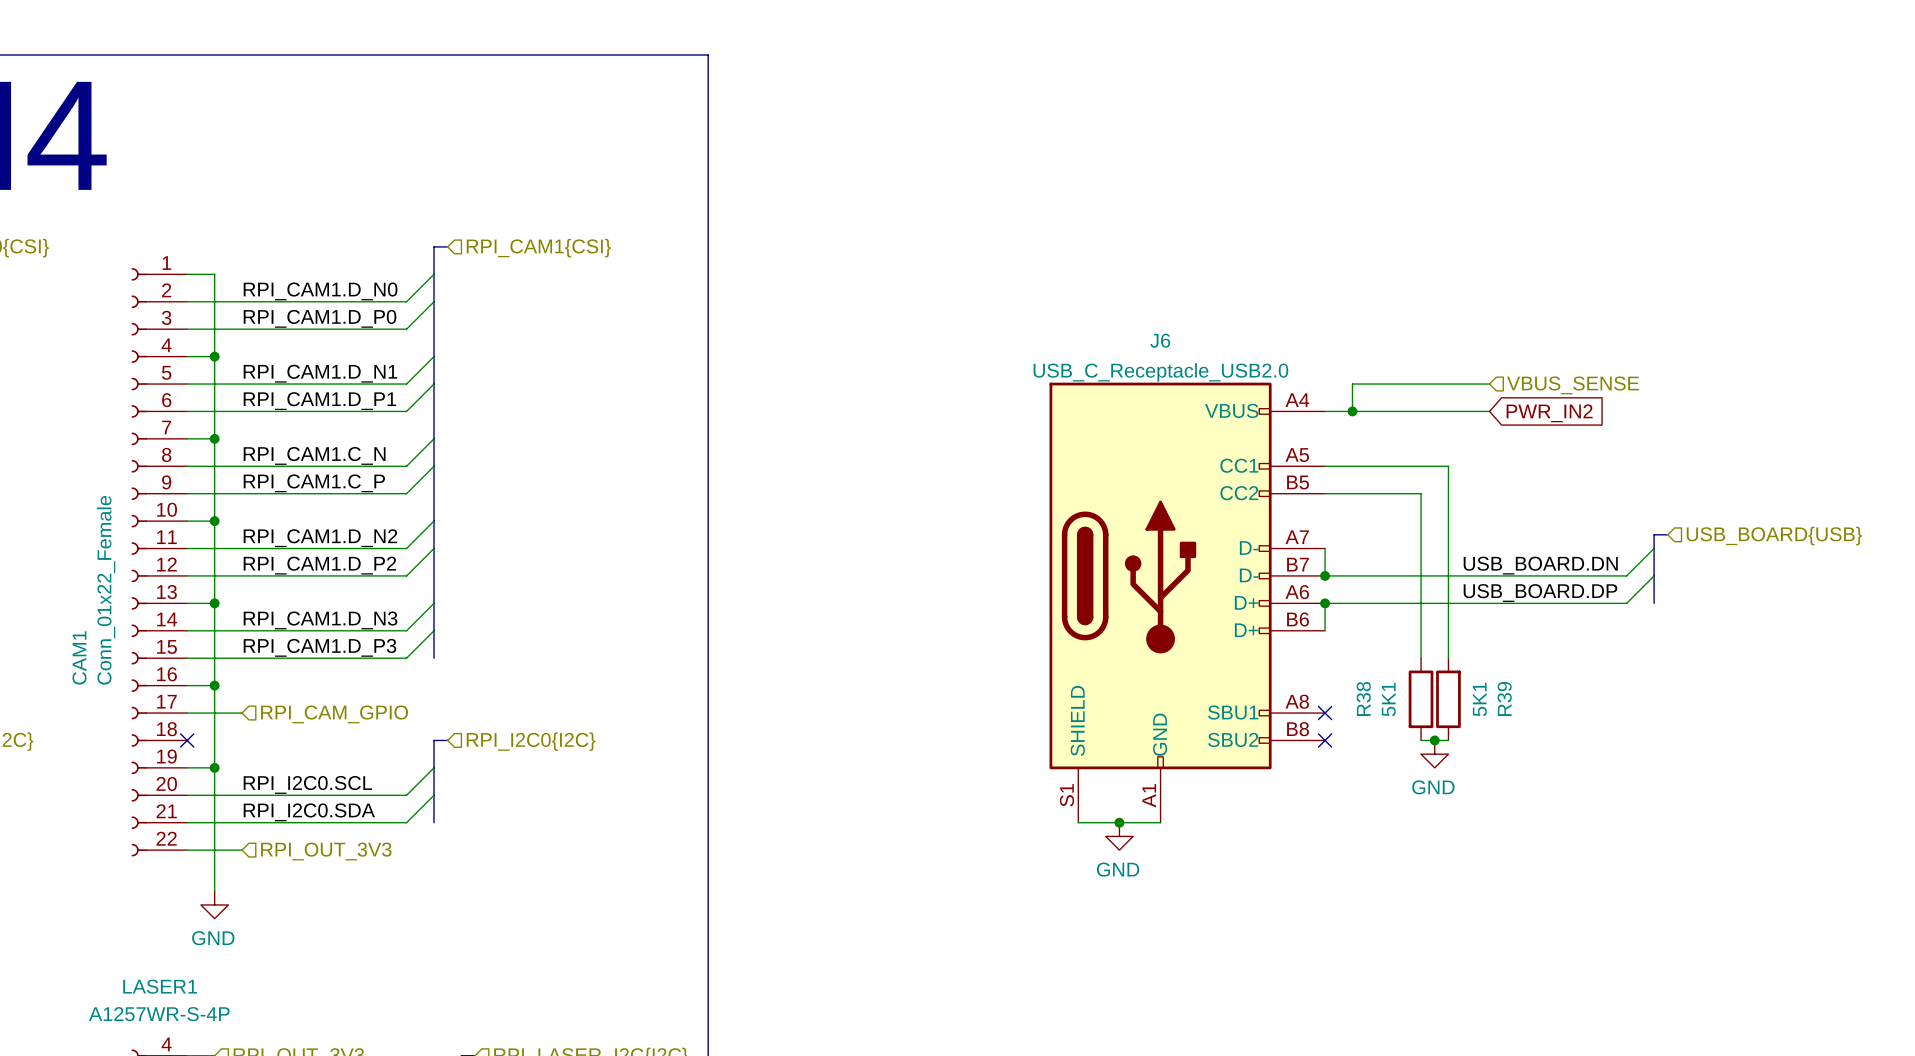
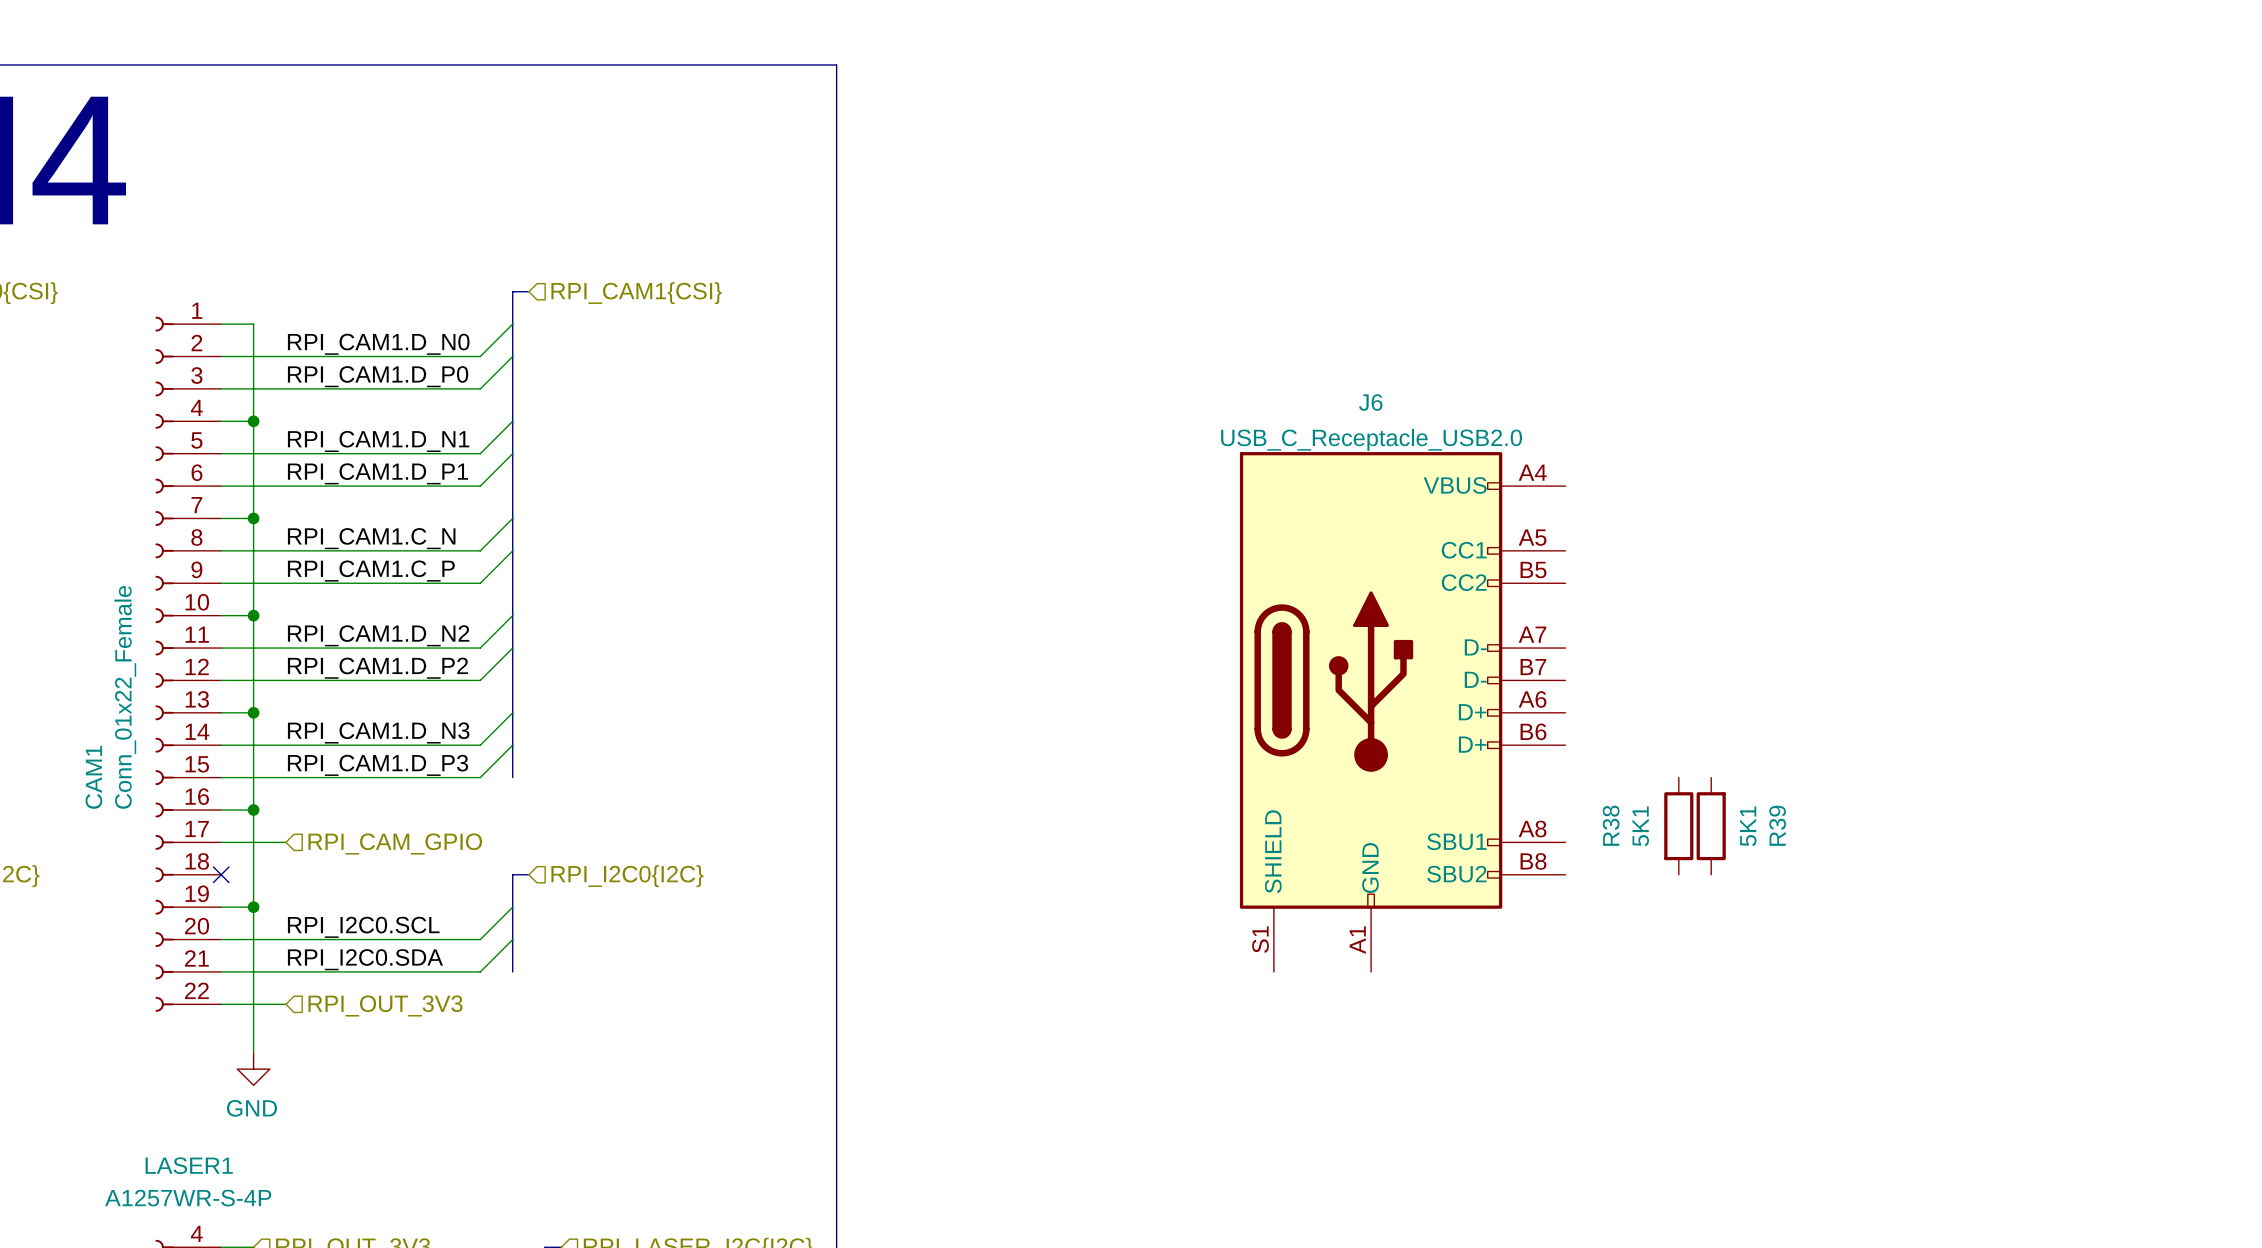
wire: (1489, 384) (1352, 384) (1352, 411) -> none
hierarchical label: VBUS_SENSE (1573, 385) -> none
wire: (1325, 411) (1489, 411) -> none
junction: (1352, 411) -> none
global label: PWR_IN2 (1549, 413) -> none
wire: (1325, 466) (1448, 466) (1448, 658) -> none
wire: (1325, 493) (1421, 493) (1421, 658) -> none
bus: (1667, 534) (1654, 534) (1654, 603) -> none
hierarchical label: USB_BOARD{USB} (1774, 536) -> none
wire: (1325, 548) (1325, 575) (1626, 575) (1654, 548) -> none
label: USB_BOARD.DN (1540, 565) -> none
junction: (1325, 575) -> none
wire: (1654, 575) (1626, 603) (1325, 603) (1325, 630) -> none
label: USB_BOARD.DP (1540, 593) -> none
junction: (1325, 603) -> none
no-connect mark: (1325, 713) -> none
no-connect mark: (1325, 740) -> none
wire: (1421, 740) (1448, 740) -> none
junction: (1434, 740) -> none
power symbol: GND (1434, 754) -> none
wire: (1078, 822) (1160, 822) -> none
junction: (1119, 822) -> none
power symbol: GND (1119, 836) -> none

